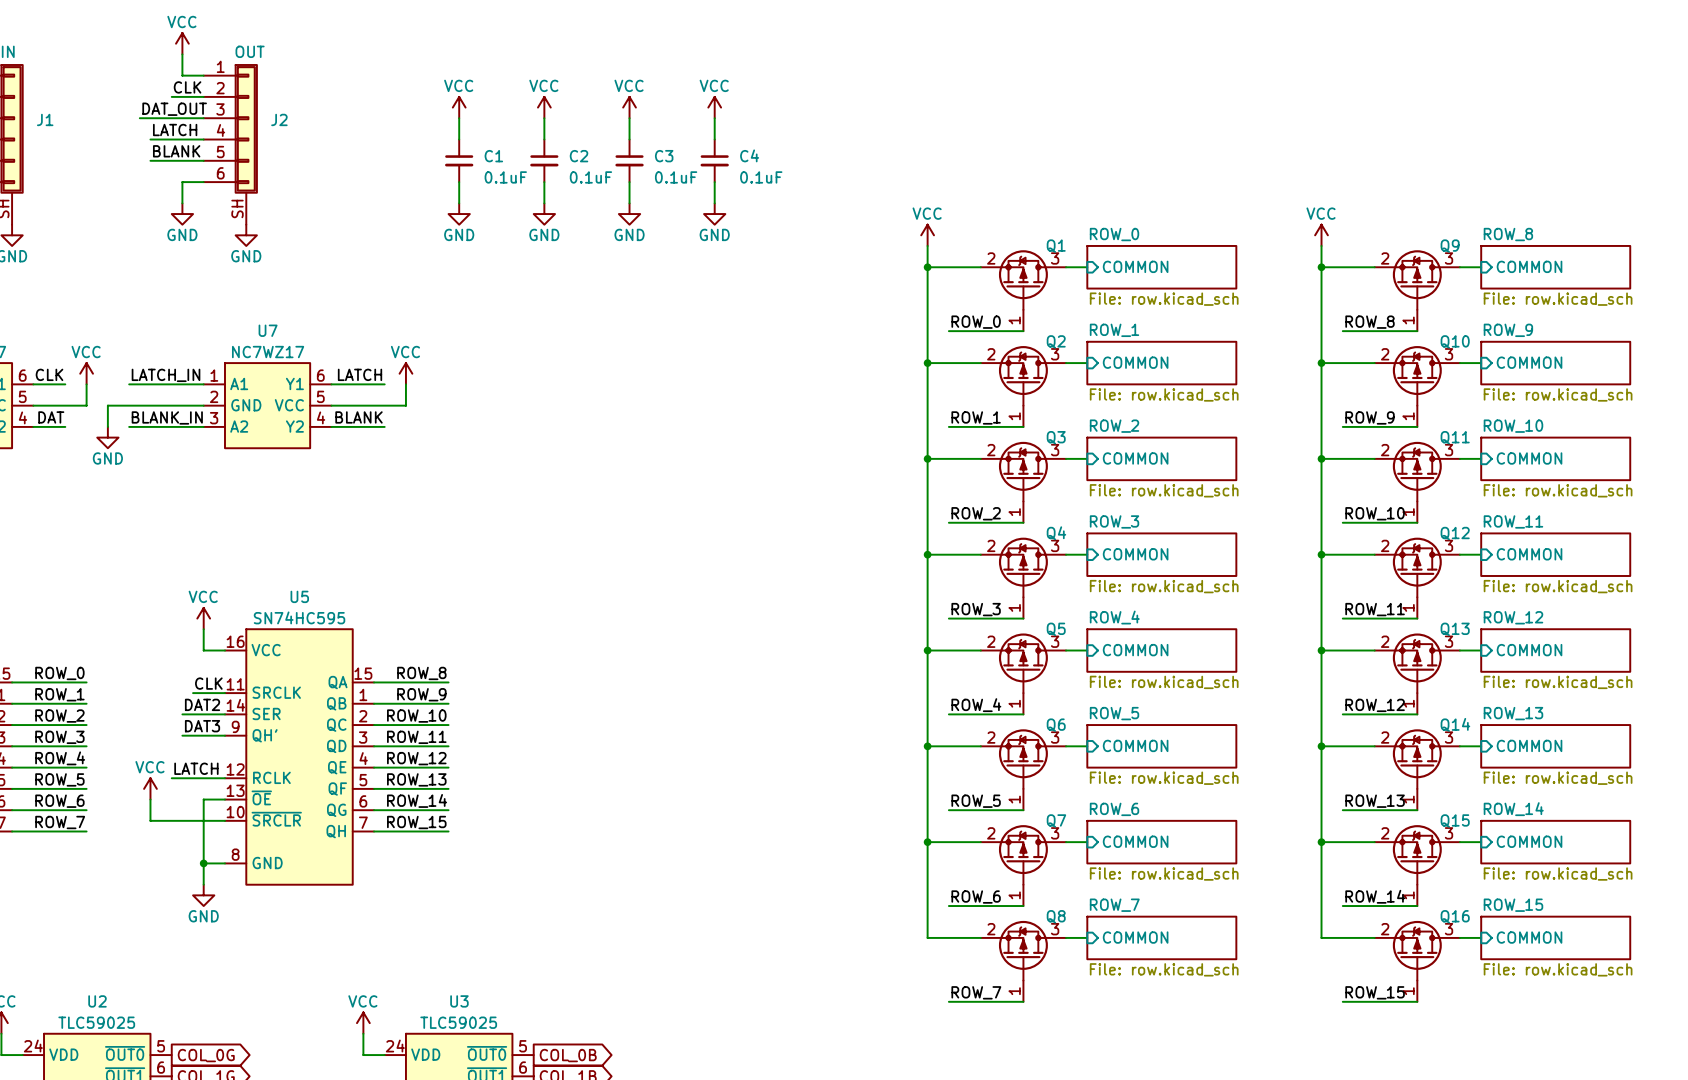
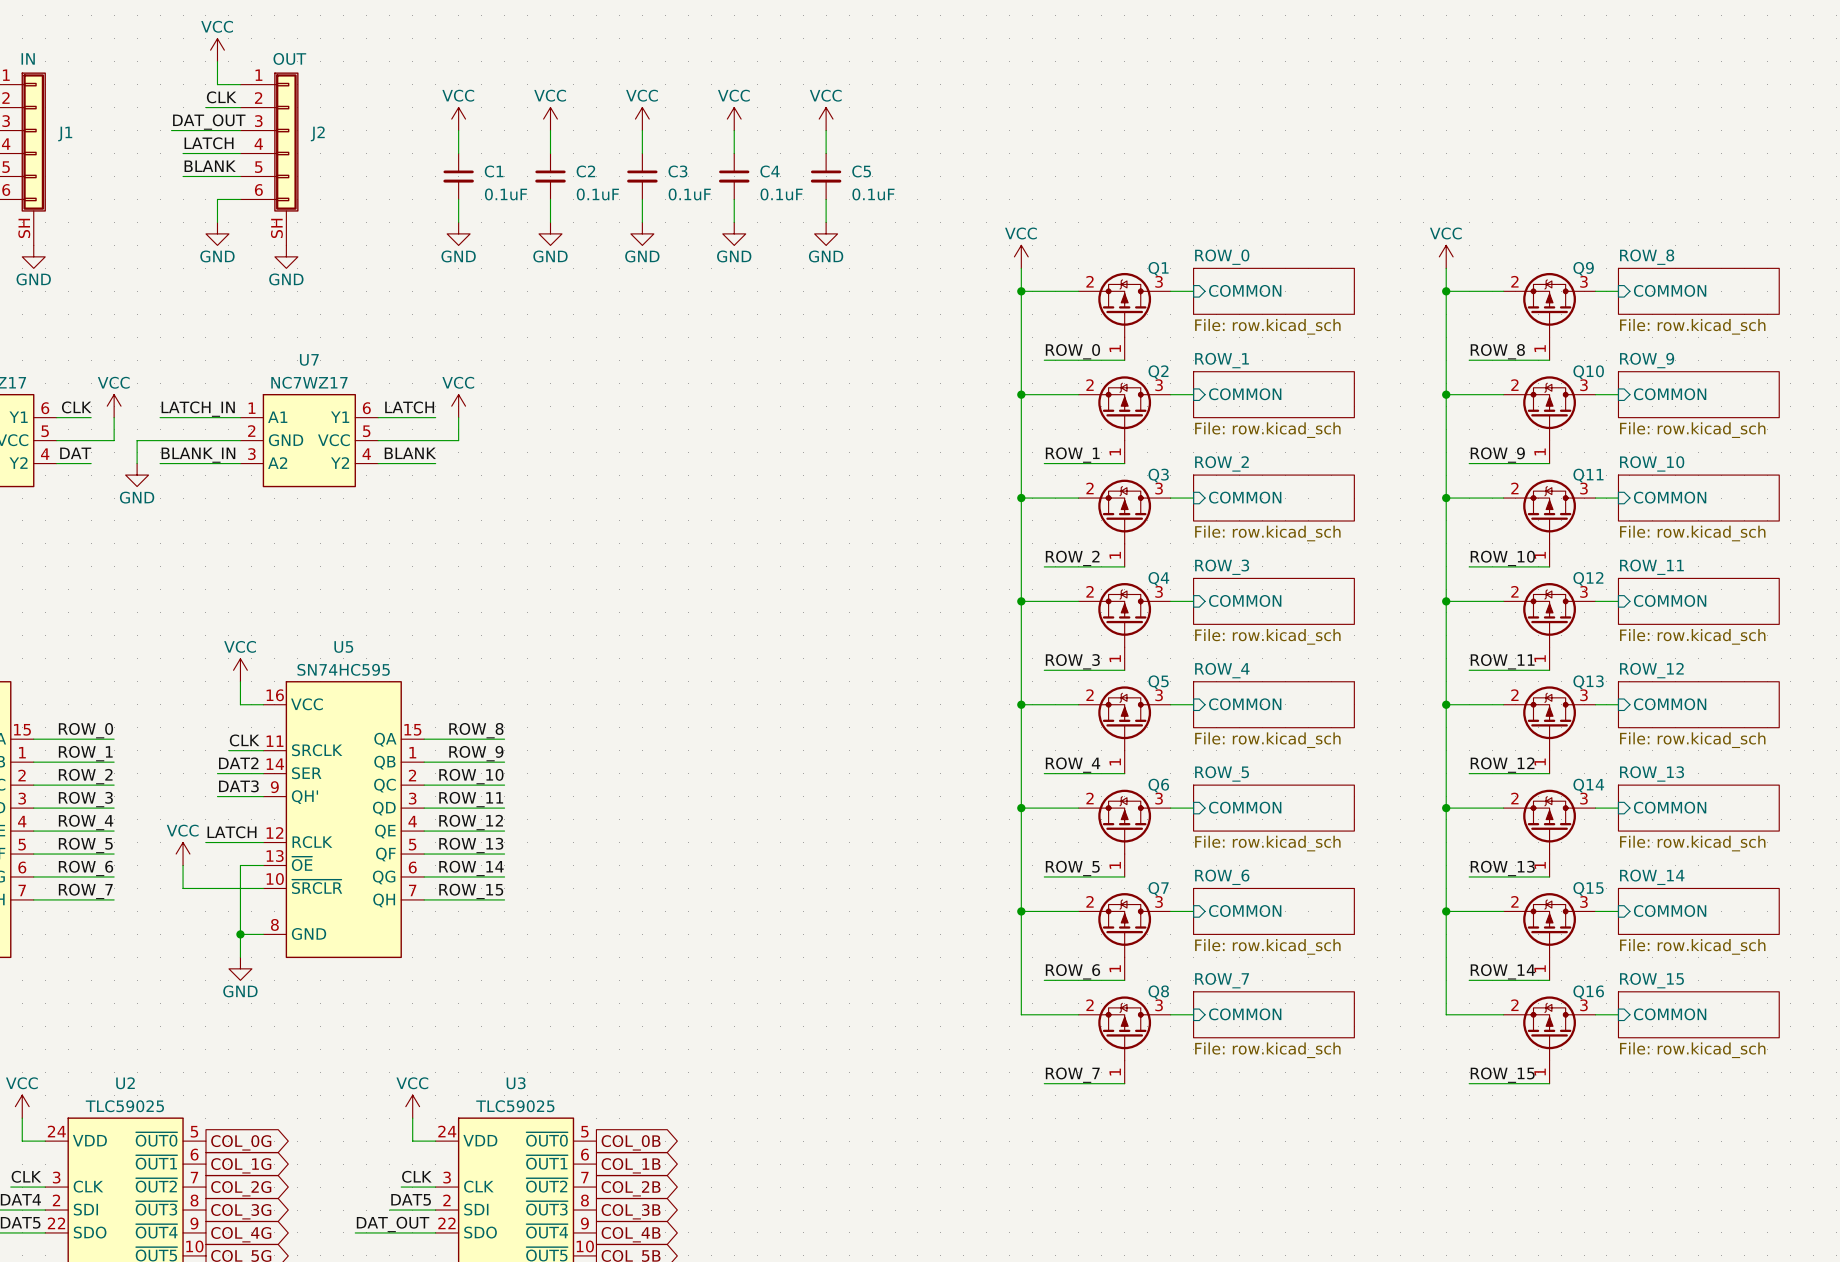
power symbol: none -> VCC (458, 119)
power symbol: VCC (459, 107) -> none
power symbol: none -> VCC (550, 119)
power symbol: VCC (544, 107) -> none
power symbol: none -> VCC (642, 119)
power symbol: VCC (629, 107) -> none
power symbol: none -> VCC (734, 119)
power symbol: VCC (714, 107) -> none
power symbol: none -> VCC (826, 119)
wire: none -> (458, 130) (458, 153)
wire: (459, 118) (459, 139) -> (550, 130) (550, 153)
wire: (544, 118) (544, 139) -> (642, 130) (642, 153)
wire: (629, 118) (629, 139) -> (734, 130) (734, 153)
wire: (714, 118) (714, 139) -> (826, 130) (826, 153)
C1 position: (459, 160) -> (458, 176)
C2 position: (544, 160) -> (550, 176)
C3 position: (629, 160) -> (642, 176)
C4 position: (714, 160) -> (734, 176)
C5: none -> 0.1uF (826, 176)
wire: none -> (458, 199) (458, 222)
wire: (459, 182) (459, 203) -> (550, 199) (550, 222)
wire: (544, 182) (544, 203) -> (642, 199) (642, 222)
wire: (629, 182) (629, 203) -> (734, 199) (734, 222)
wire: (714, 182) (714, 203) -> (826, 199) (826, 222)
power symbol: none -> GND (458, 233)
power symbol: GND (459, 214) -> none
power symbol: none -> GND (550, 233)
power symbol: GND (544, 214) -> none
power symbol: none -> GND (642, 233)
power symbol: GND (629, 214) -> none
power symbol: none -> GND (734, 233)
power symbol: GND (714, 214) -> none
power symbol: none -> GND (826, 233)

